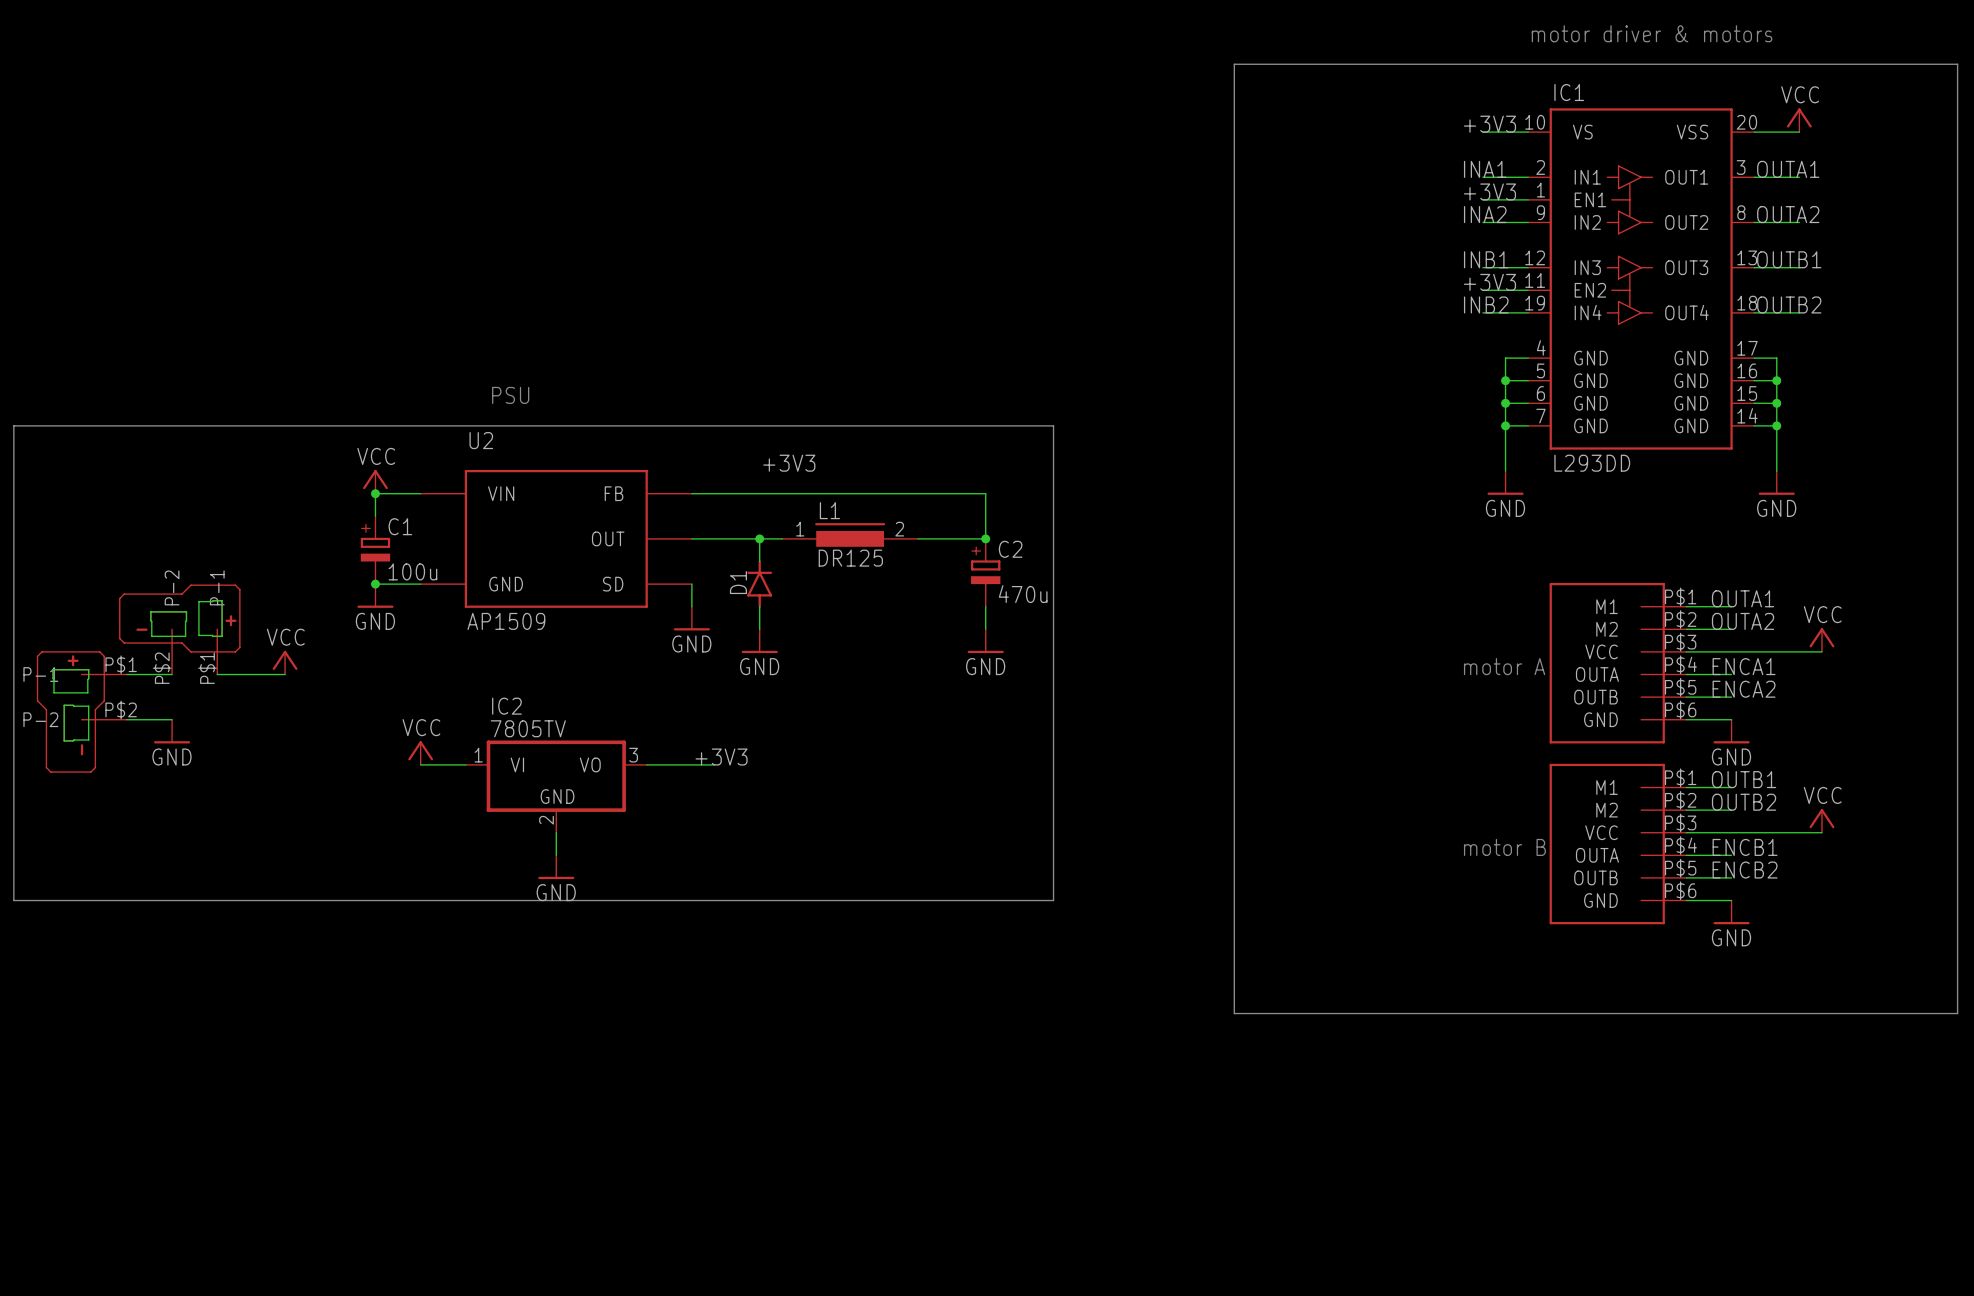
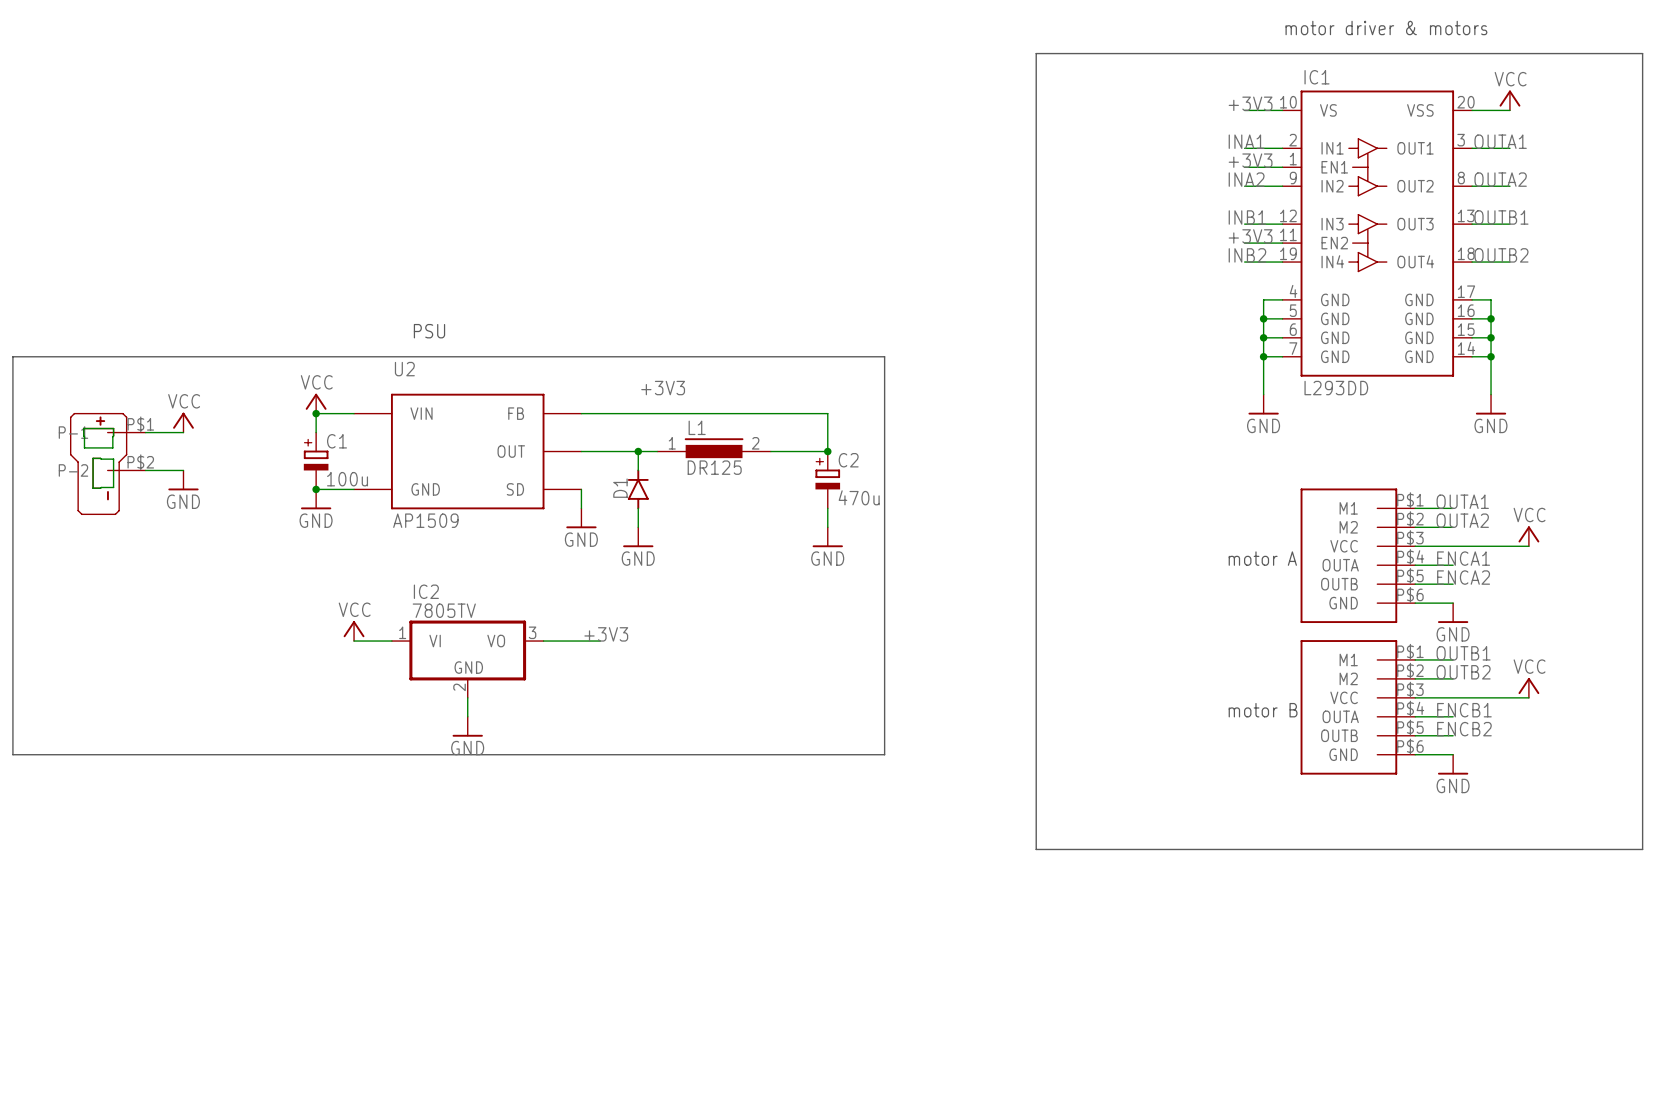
part: none -> (107, 463)
part: (179, 629) -> none
power symbol position: VCC (285, 662) -> VCC (183, 422)
wire: (126, 674) (172, 674) -> (145, 470) (183, 470)
wire: (217, 674) (285, 674) -> none
part: (81, 711) -> none
wire: (126, 719) (172, 719) -> (145, 432) (183, 432)
power symbol position: GND (172, 731) -> GND (183, 480)

